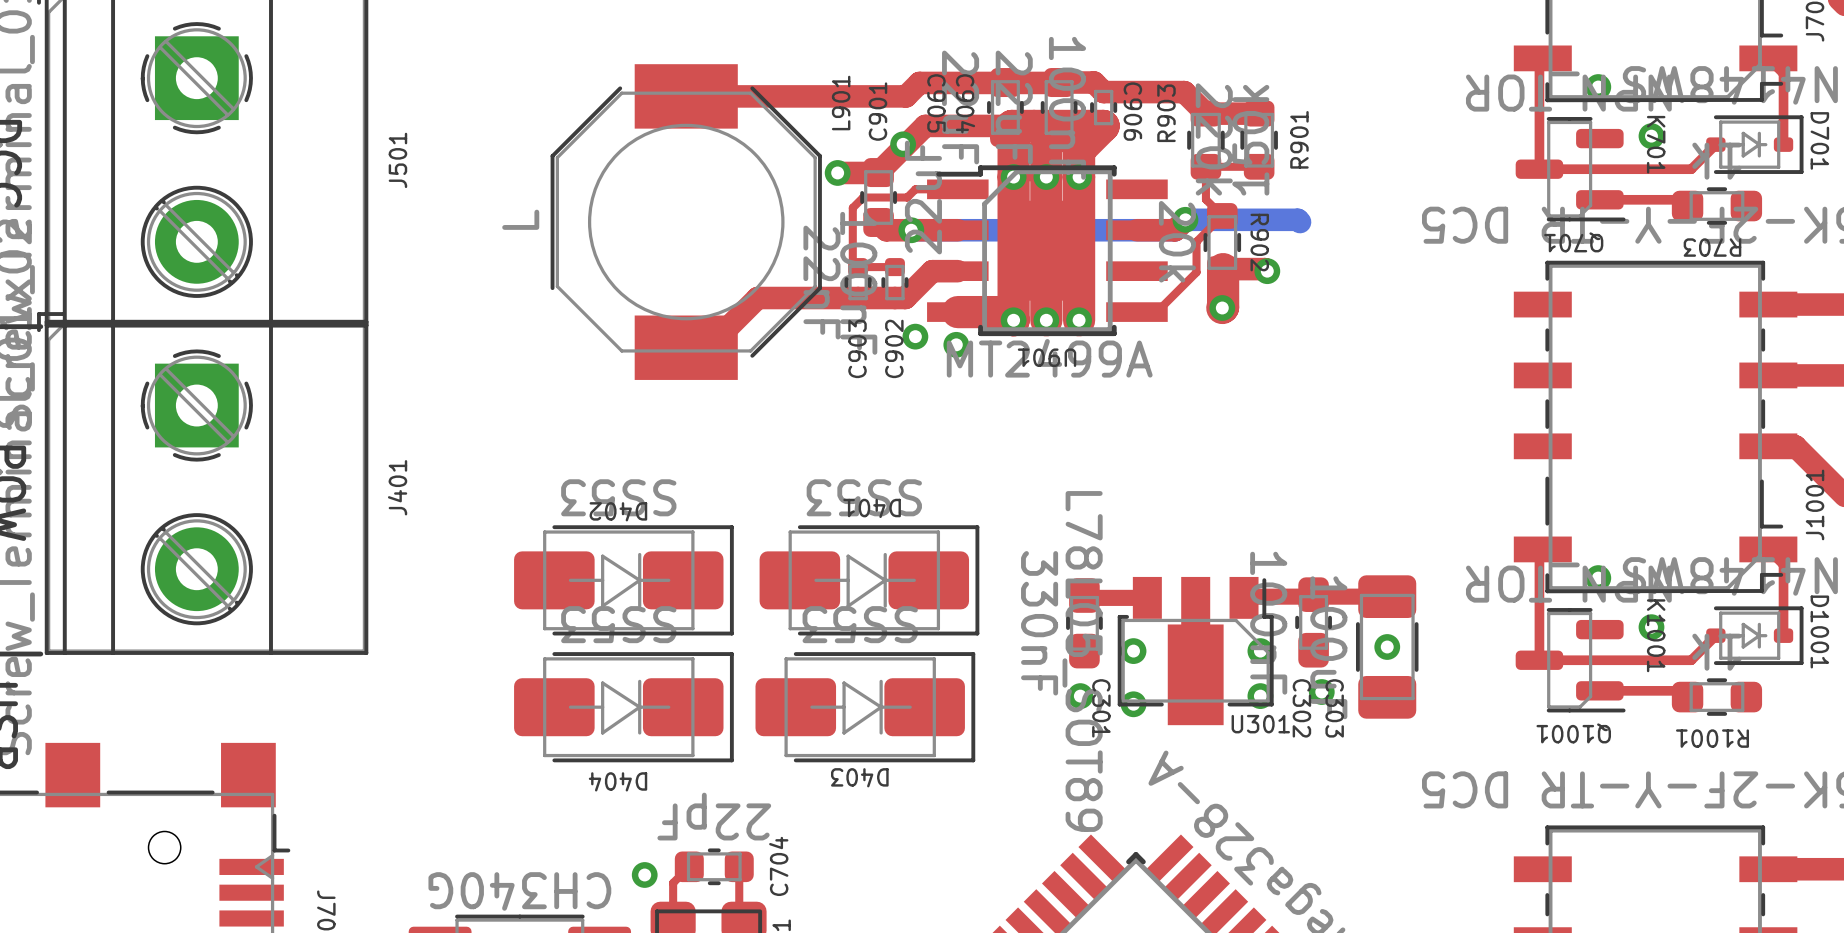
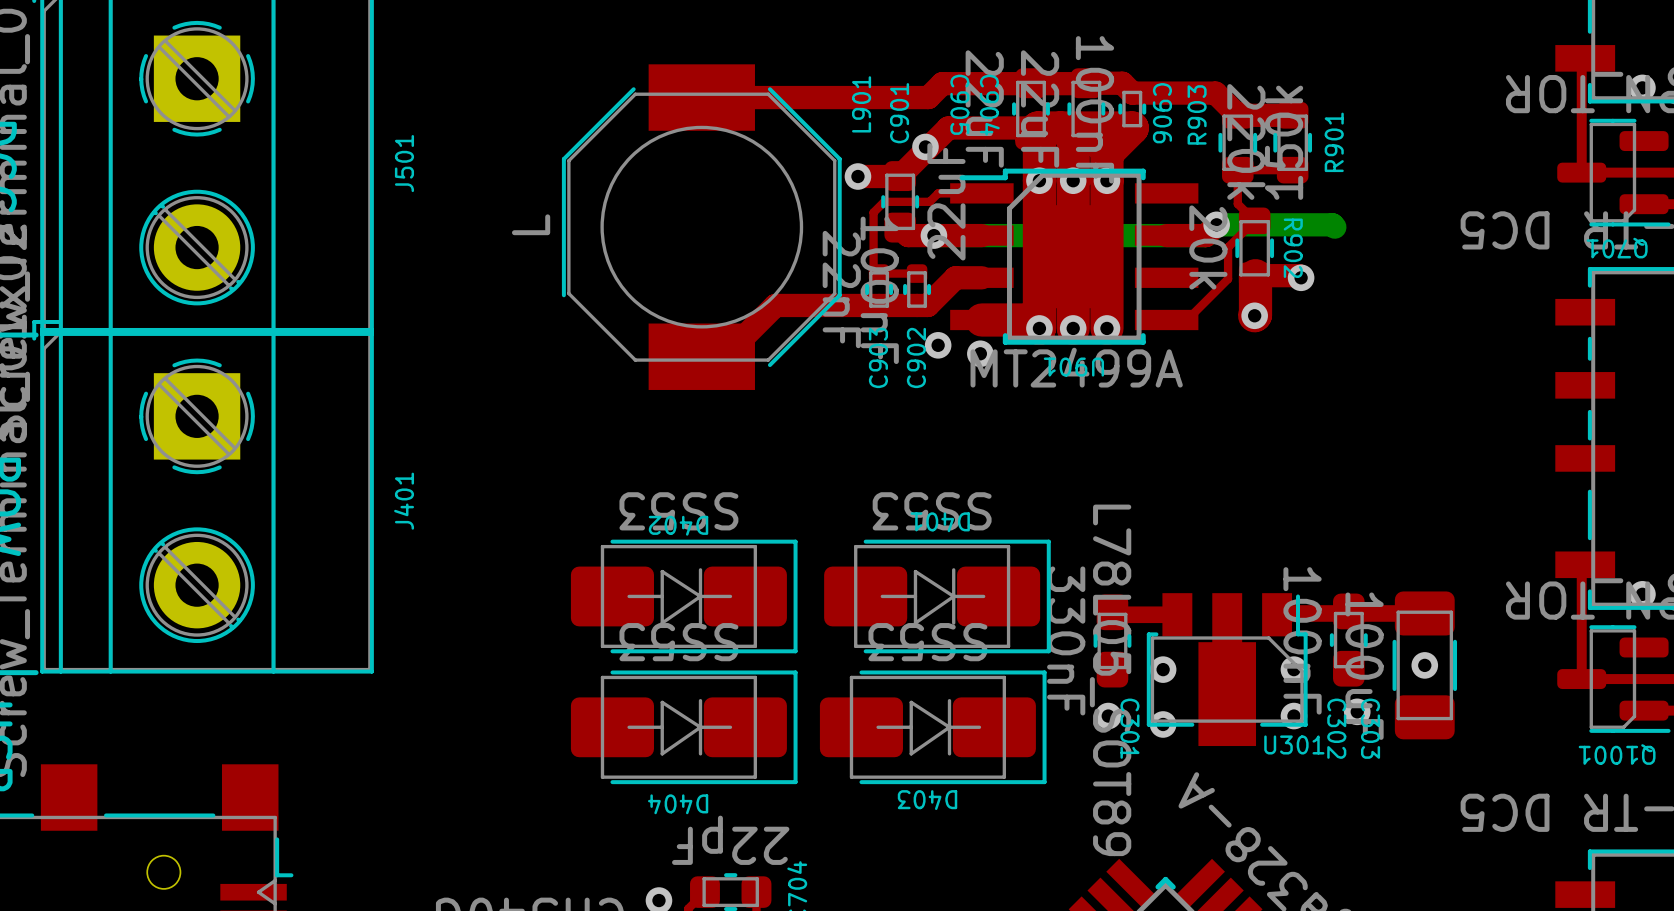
D402 position: (623, 580) -> (684, 596)
D401 position: (869, 580) -> (937, 596)
D404 position: (623, 707) -> (684, 727)
D403 position: (865, 707) -> (933, 727)

